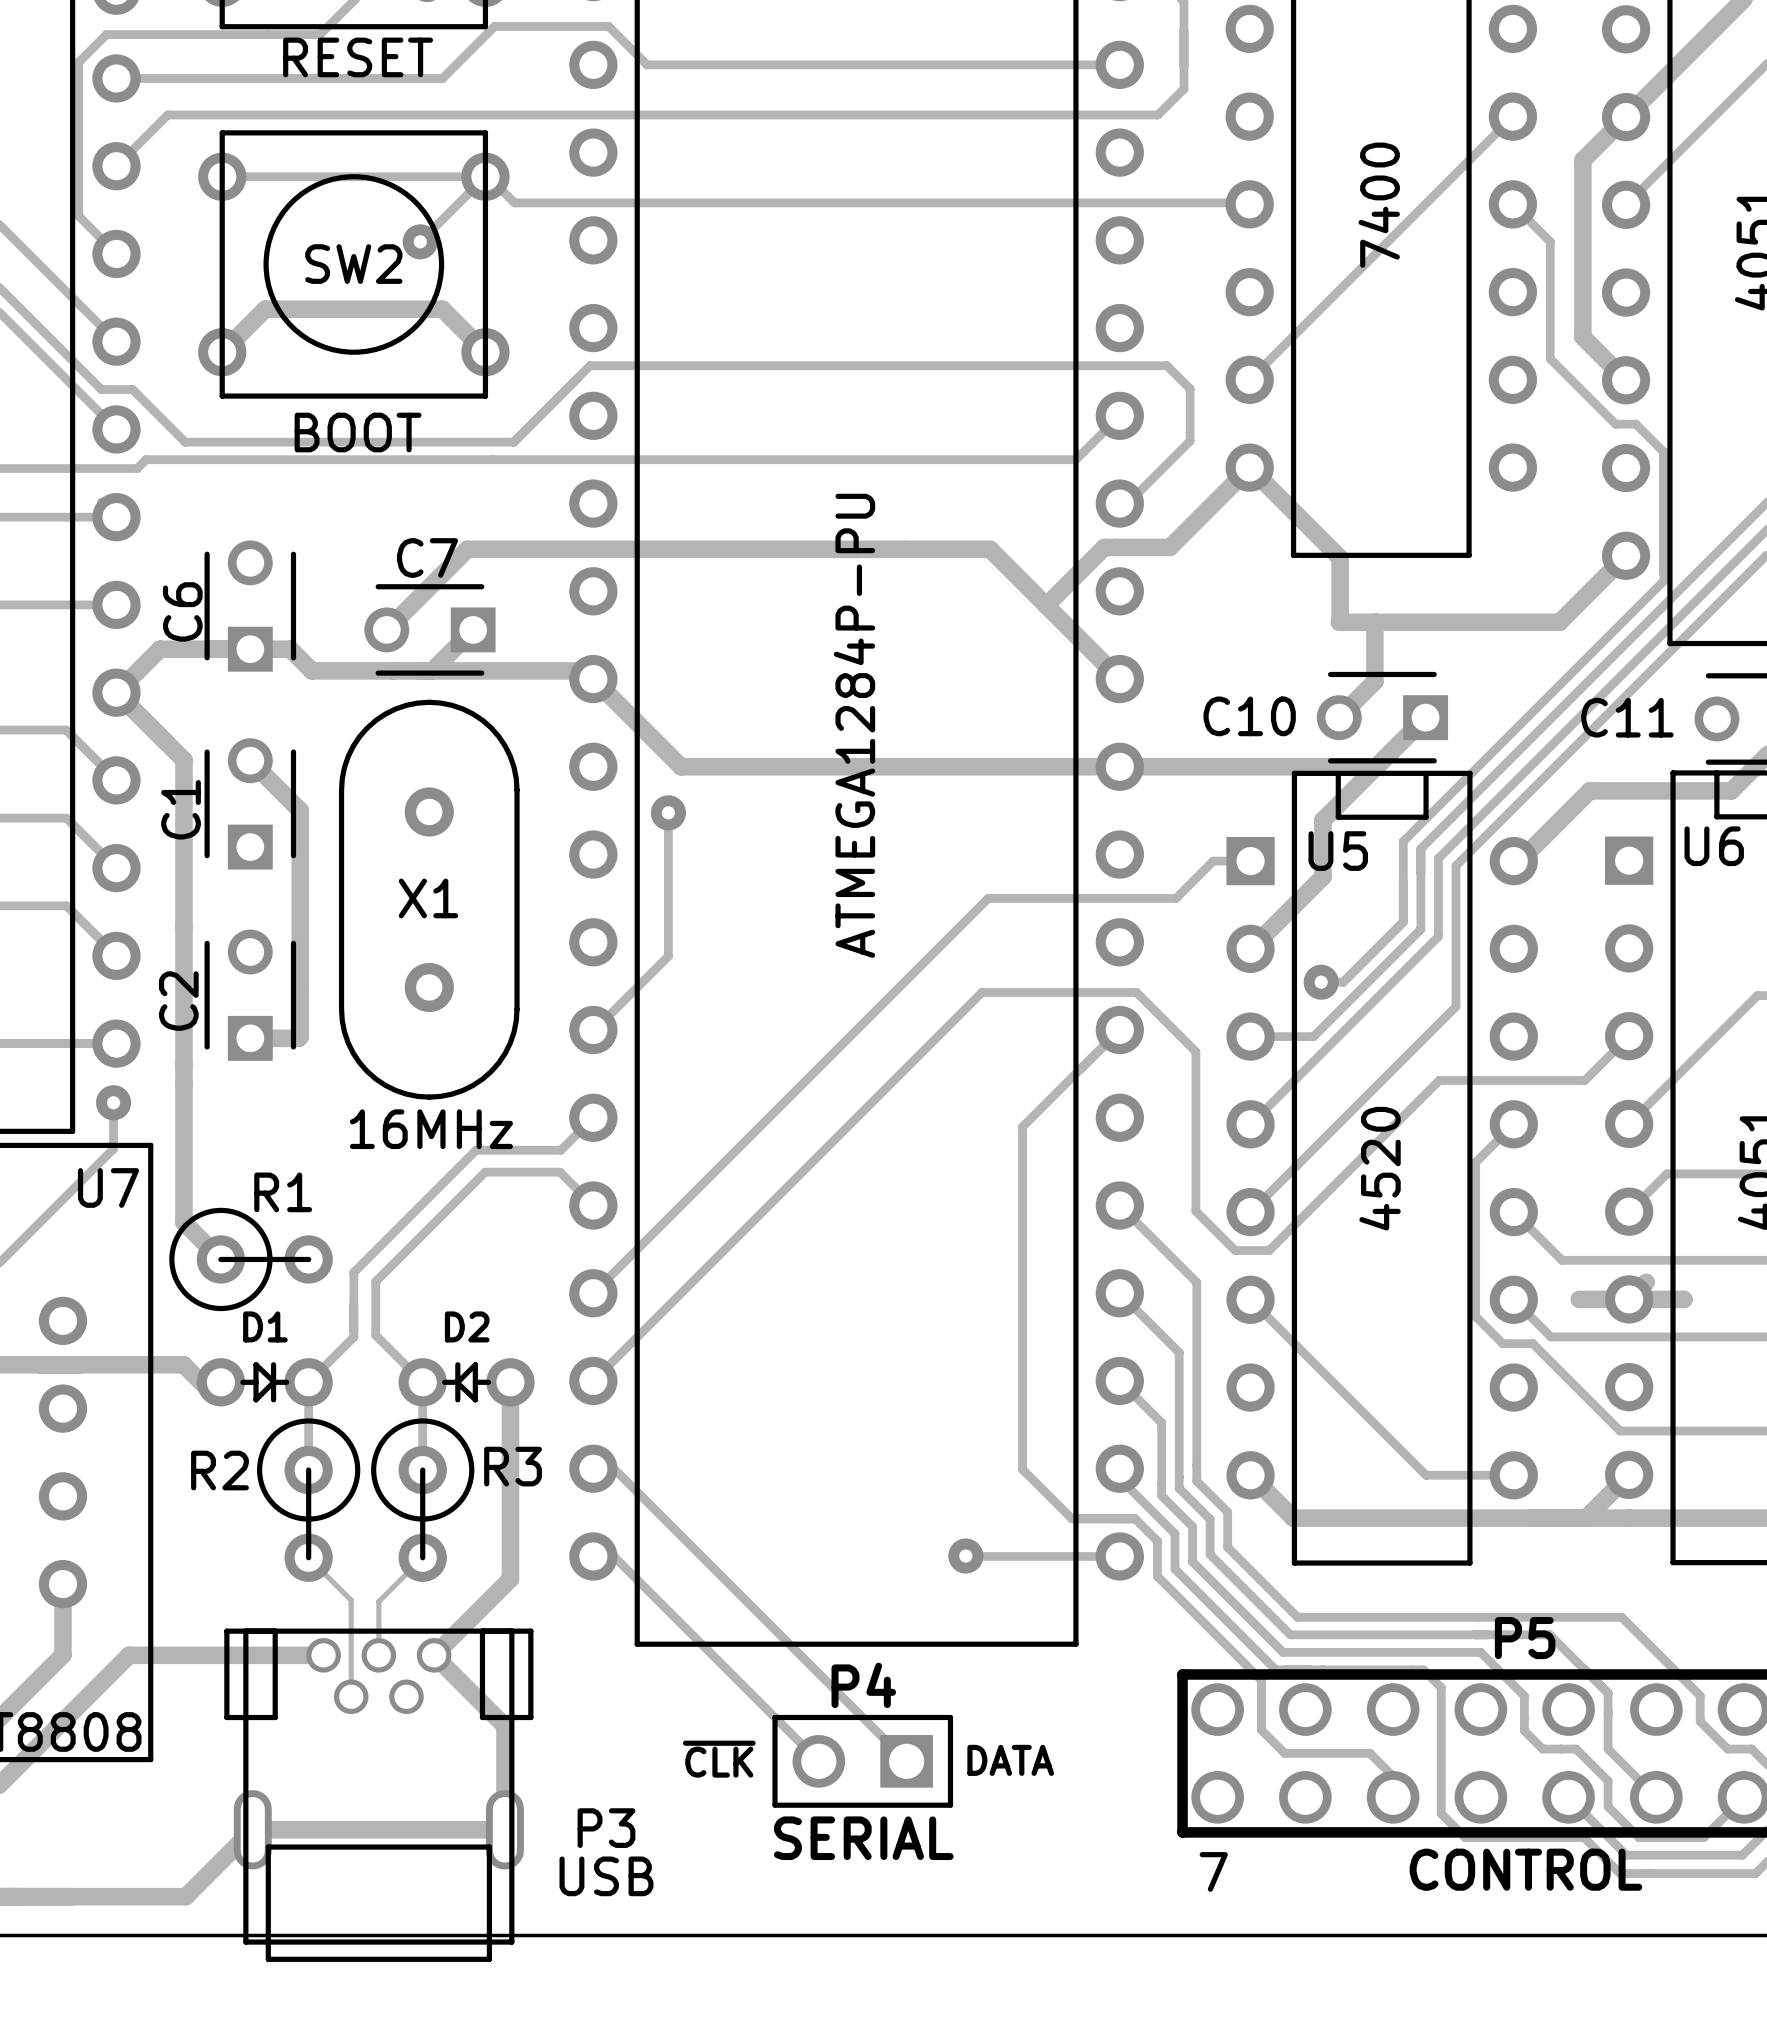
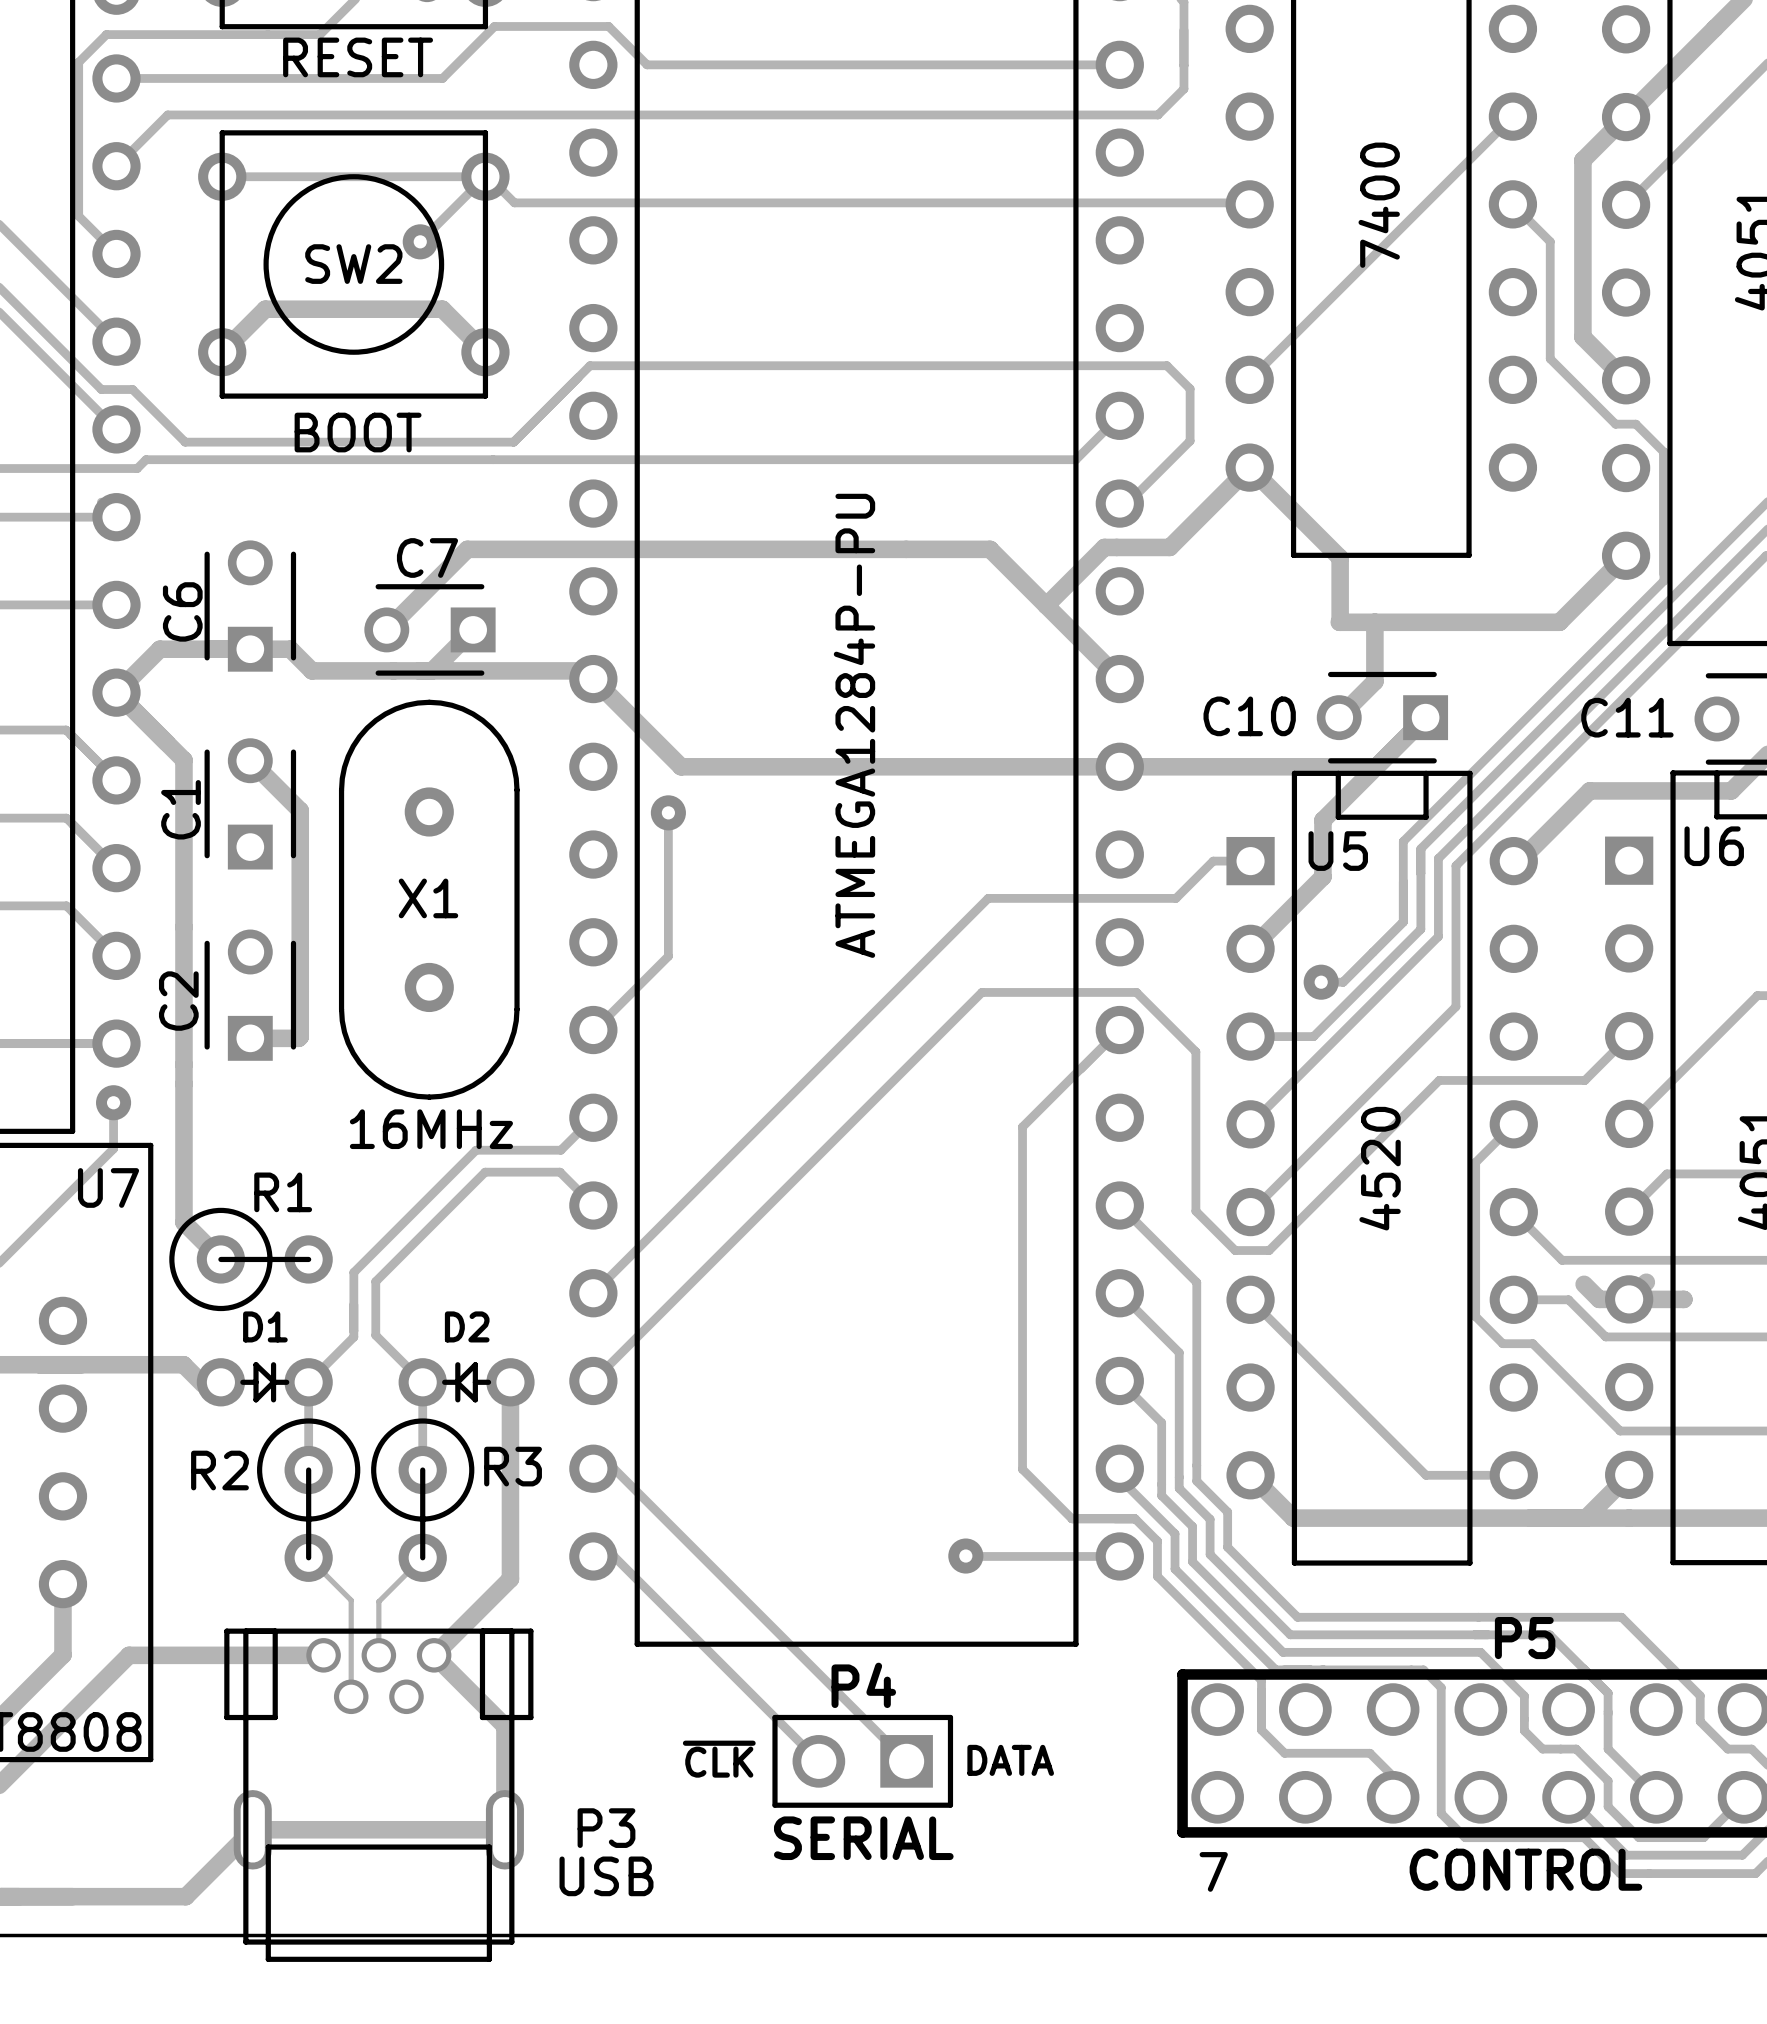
track: (1513, 1299) (1550, 1336) (1605, 1336) -> (1513, 1299) (1568, 1299) (1605, 1336)
track: (1579, 1299) (1599, 1299) -> (1584, 1284) (1599, 1299)

